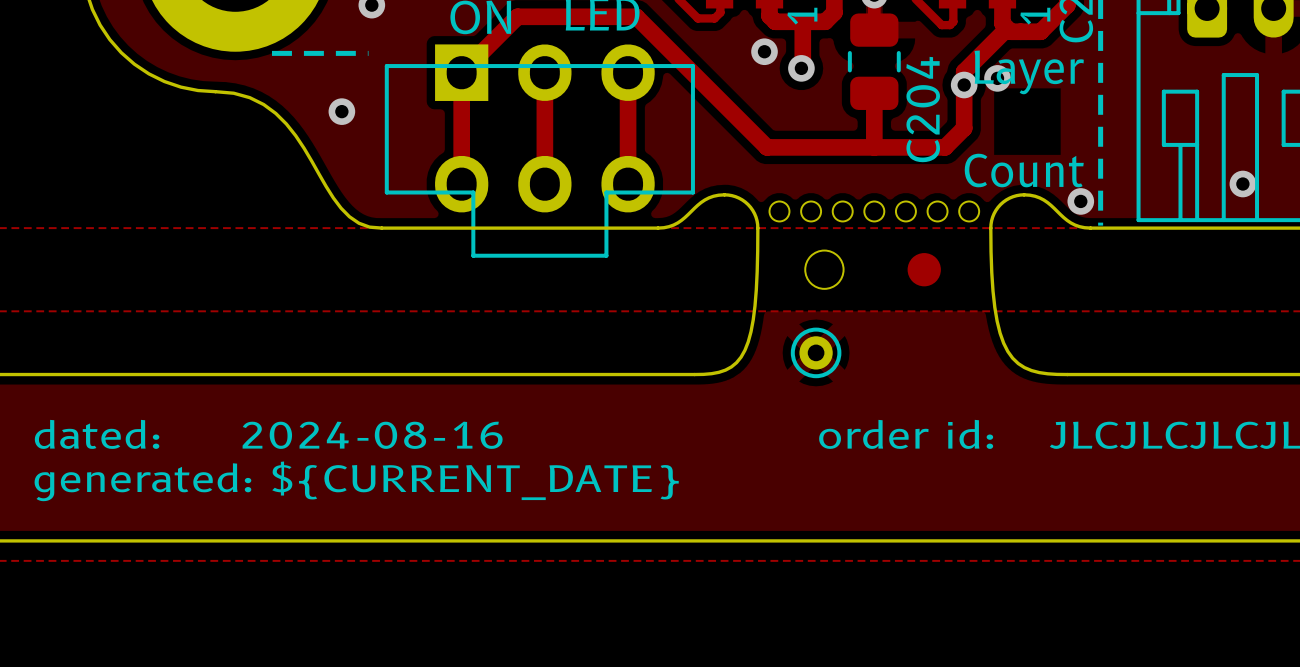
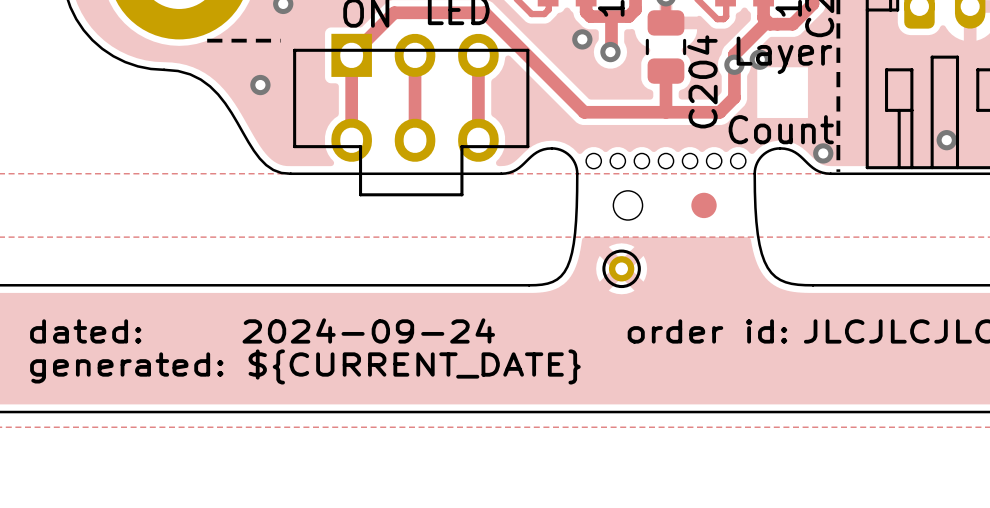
text: dated: 2024-08-16 (268, 434) -> dated: 2024-09-24 (262, 330)

